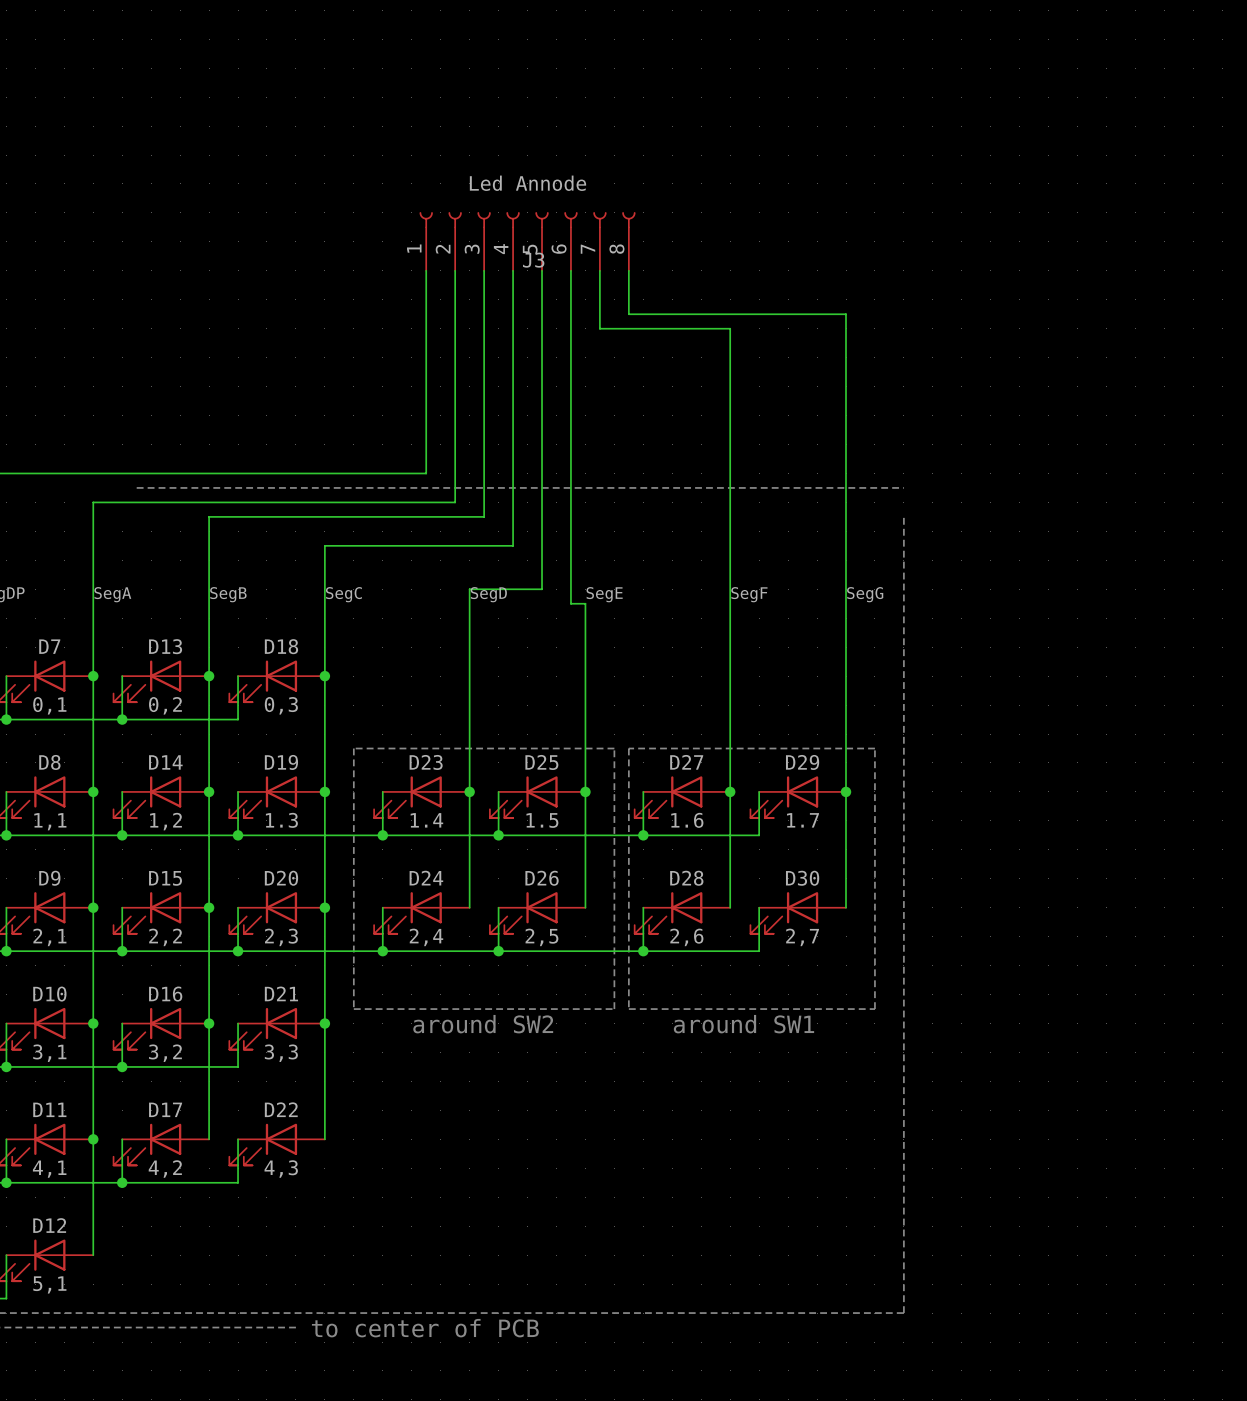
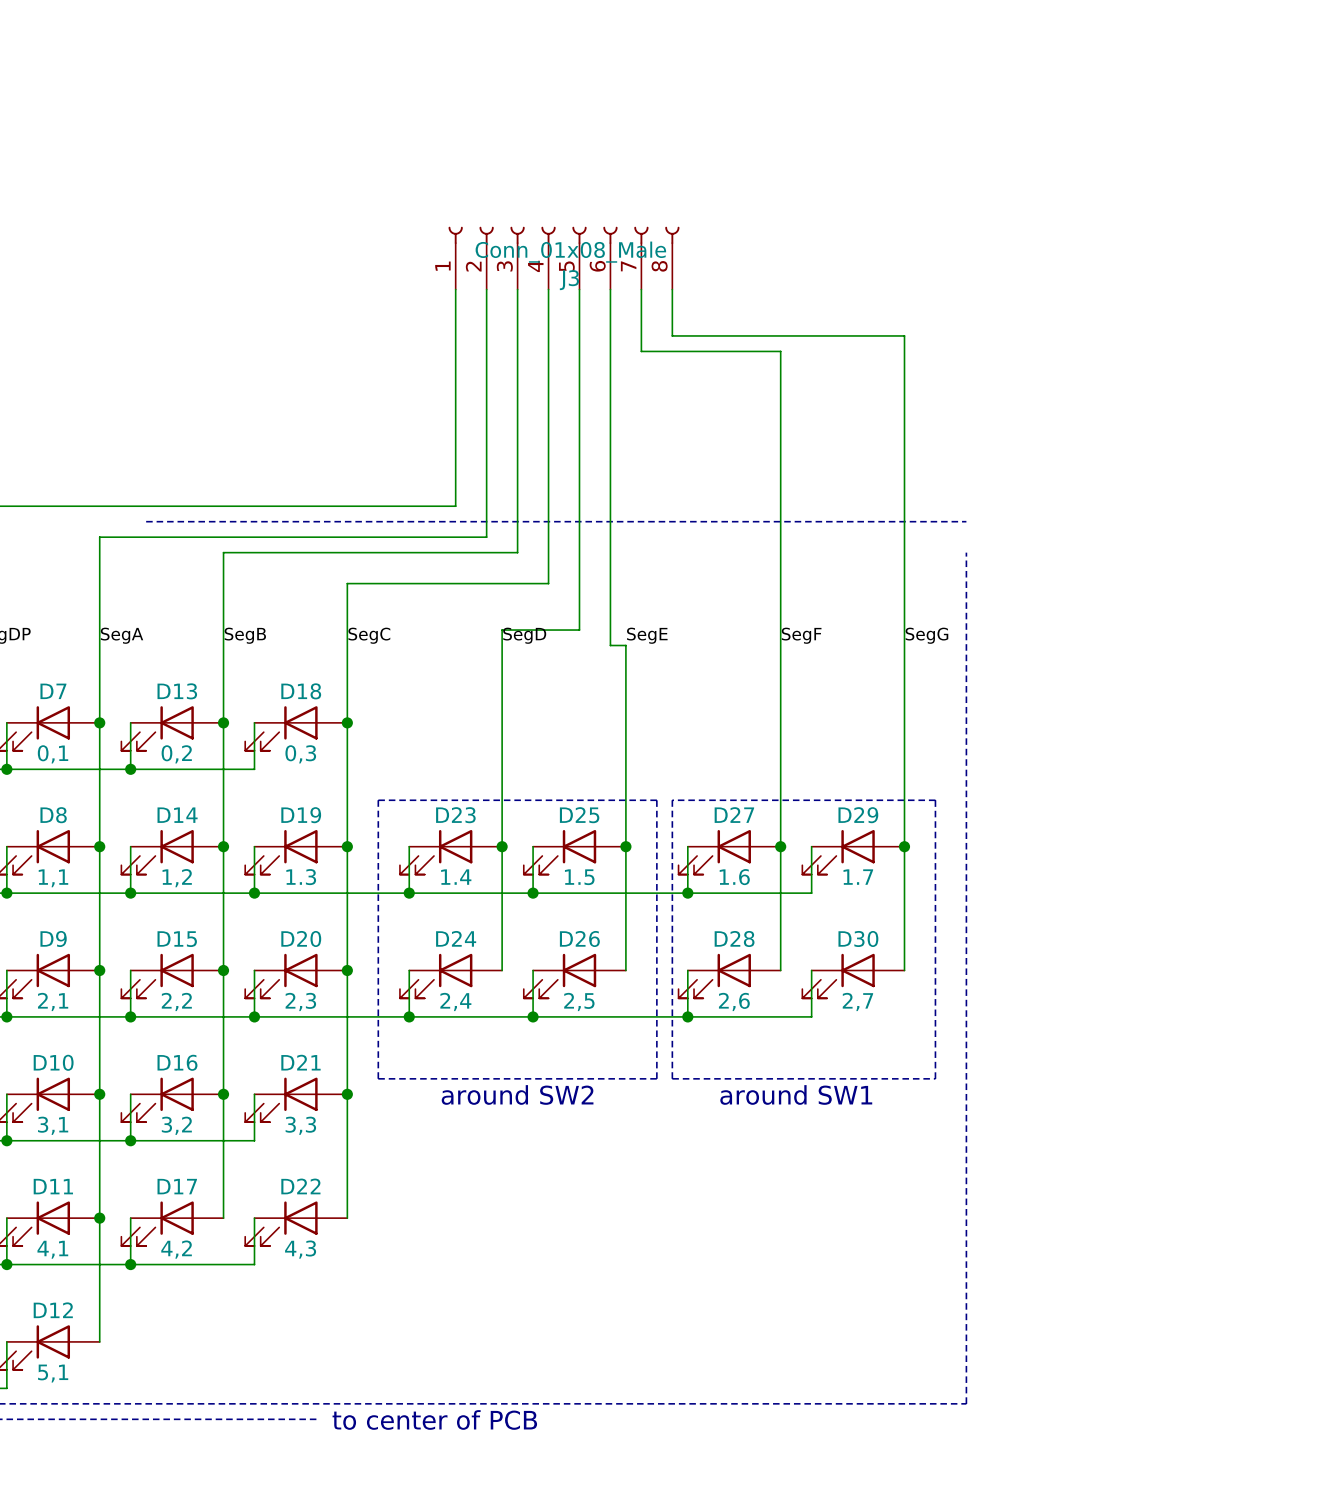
J3 value: Led Annode (527, 183) -> Conn_01x08_Male (570, 252)

